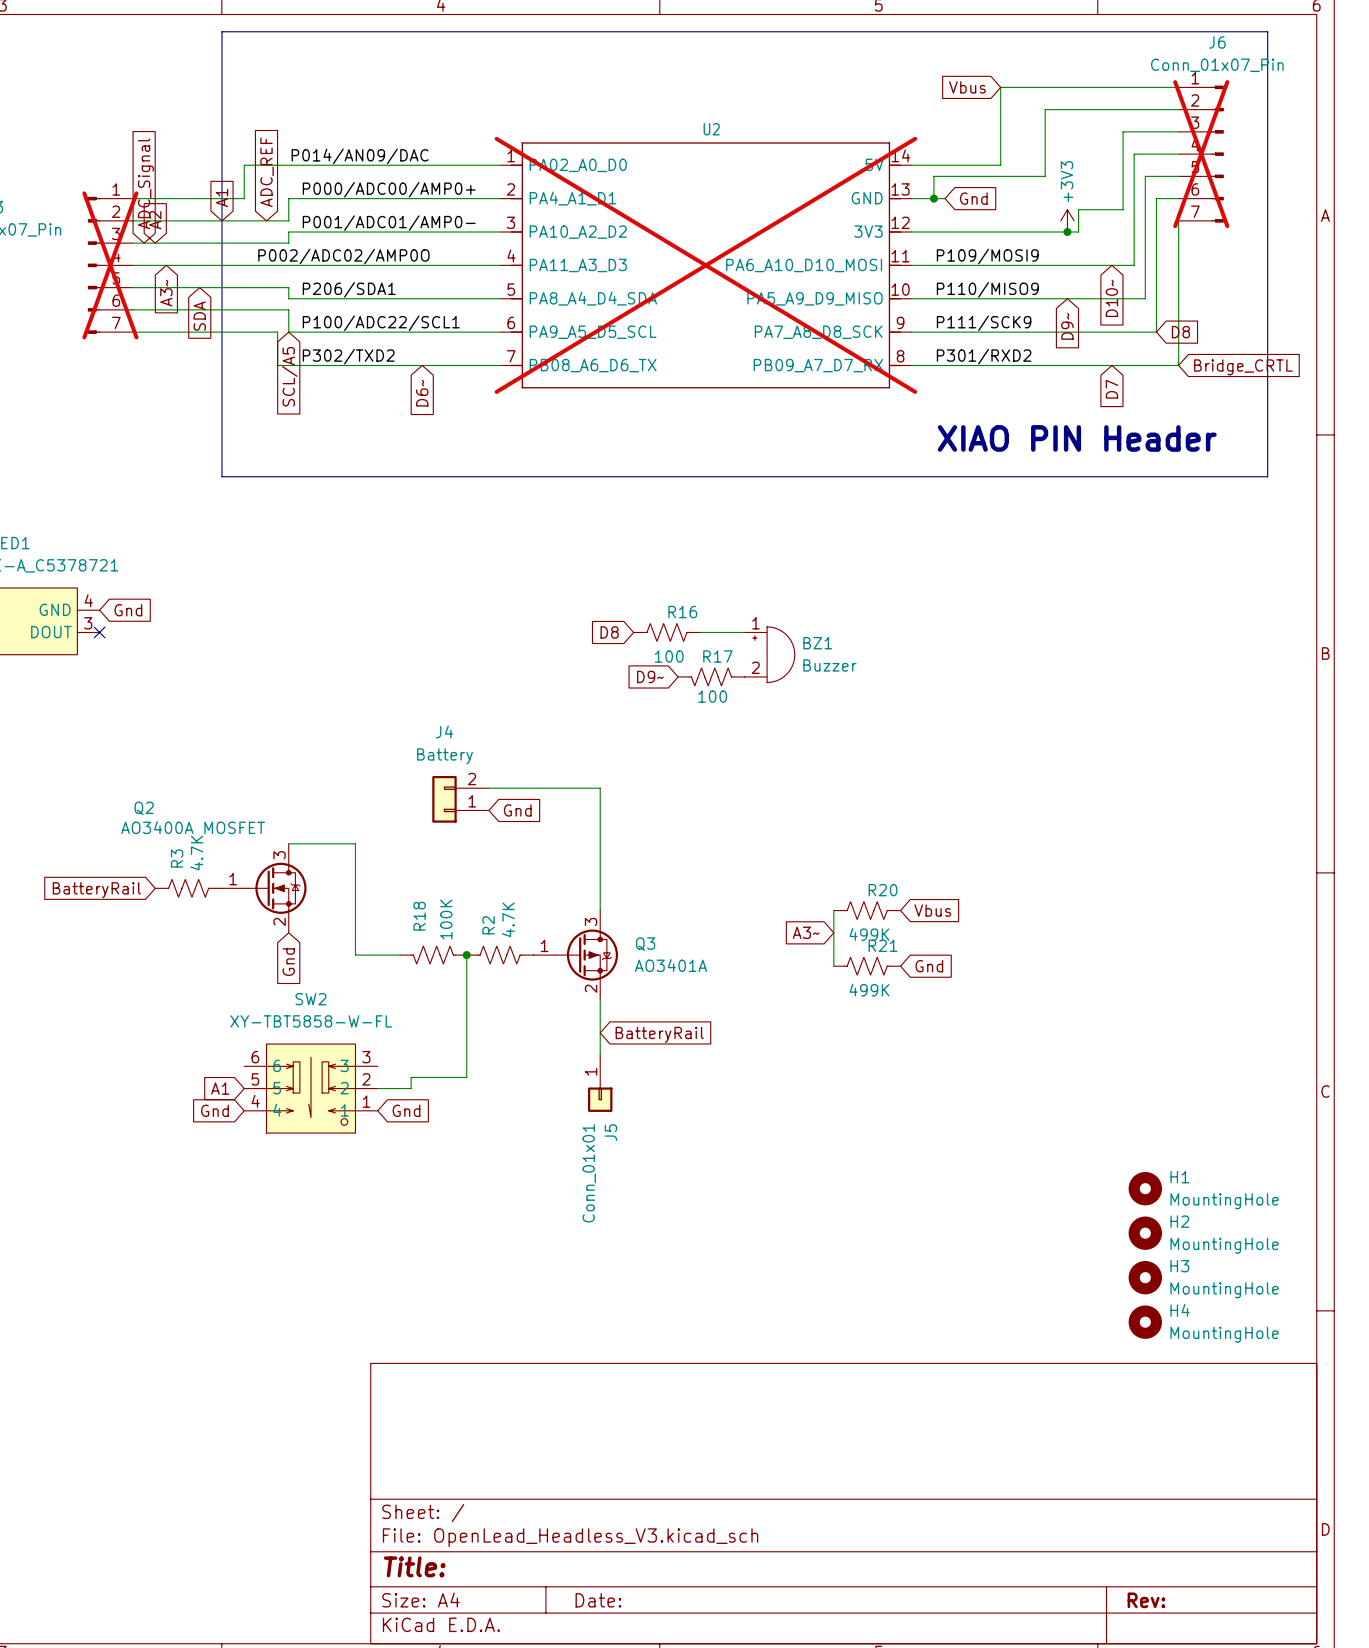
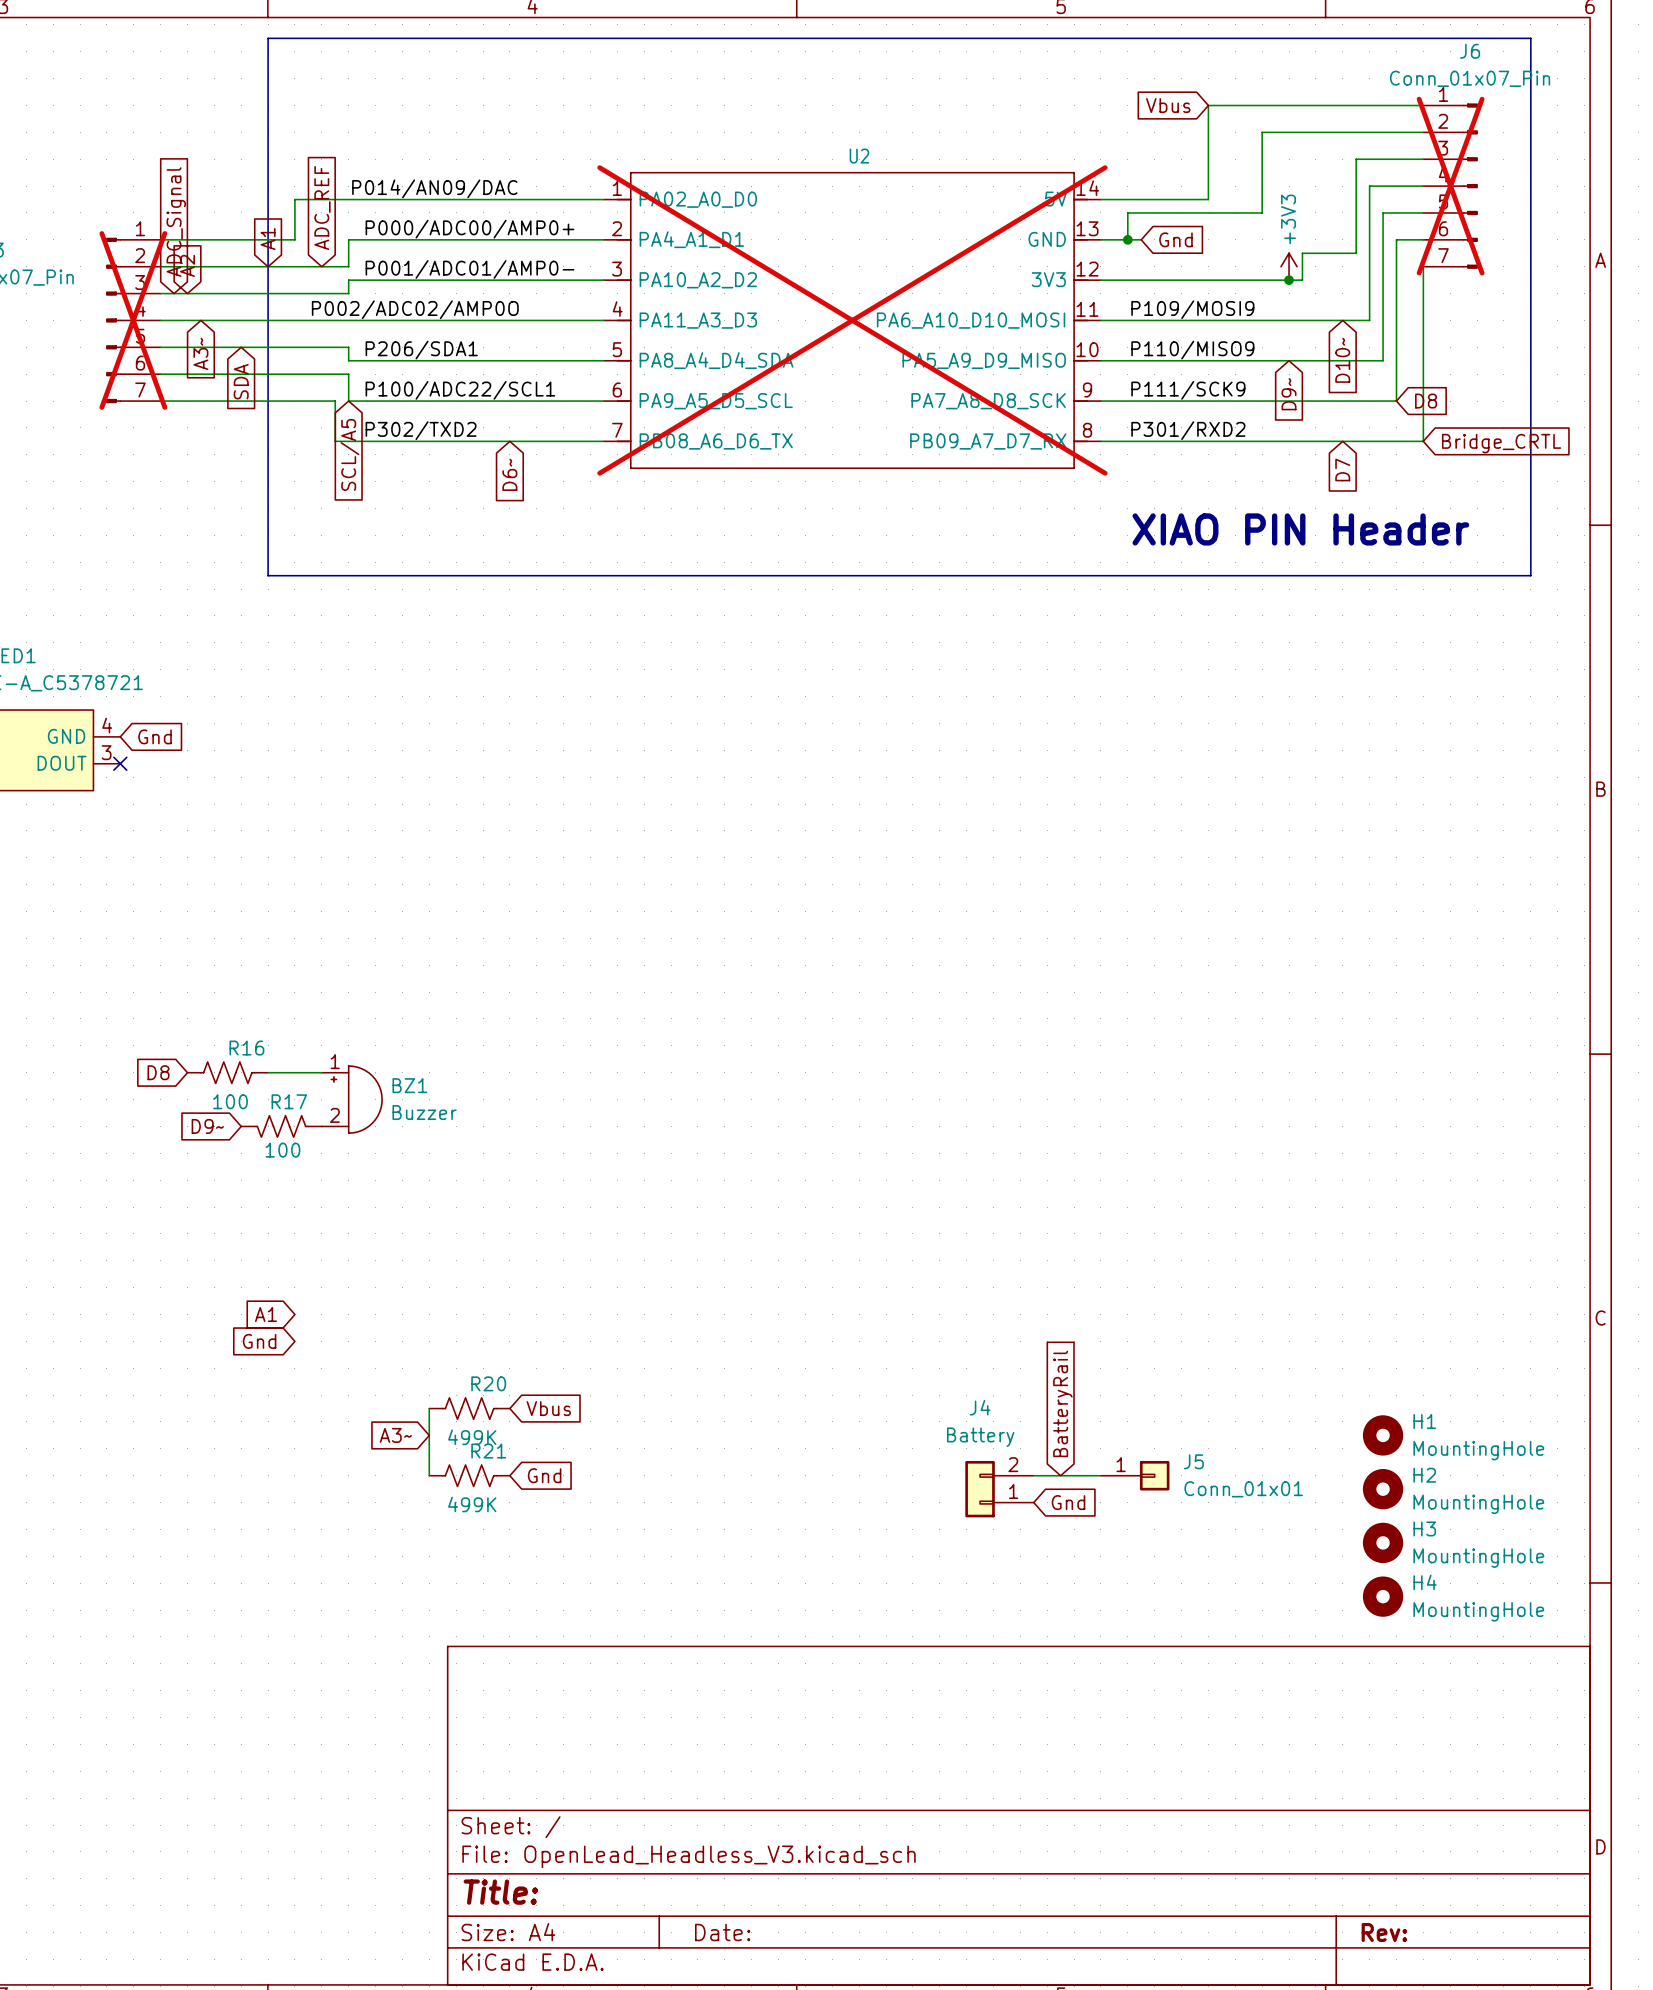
global label: D8 (609, 632) -> none
R16: 100 (666, 632) -> none
wire: (700, 632) (744, 632) -> none
BZ1 position: (769, 654) -> (351, 1099)
global label: D9~ (650, 676) -> none
R17 position: (711, 676) -> (281, 1126)
wire: (488, 788) (600, 788) (600, 910) -> none
J4 position: (460, 799) -> (999, 1489)
global label: Gnd (517, 810) -> none
wire: (288, 843) (355, 843) (355, 955) (399, 955) -> none
R3 value: 4.7K (196, 853) -> 100 (230, 1101)
R3 name: R3 (177, 858) -> R16 (246, 1048)
Q2: AO3400A MOSFET (264, 888) -> none
global label: BatteryRail (96, 890) -> D8 (158, 1072)
wire: (833, 910) (833, 966) -> none
R20 position: (867, 910) -> (469, 1408)
global label: Vbus (932, 910) -> none
global label: none -> D9~ (207, 1126)
global label: A3~ (806, 932) -> none
R18: 100K (433, 955) -> none
wire: (466, 955) (466, 1077) (411, 1077) (411, 1088) (377, 1088) -> none
junction: (466, 955) -> none
R2: 4.7K (500, 955) -> none
Q3: AO3401A (575, 955) -> none
global label: Gnd (288, 962) -> none
R21 position: (867, 966) -> (469, 1475)
global label: Gnd (929, 966) -> none
wire: (600, 999) (600, 1055) -> none
global label: BatteryRail (659, 1034) -> none
J5 position: (600, 1083) -> (1135, 1475)
SW2: XY-TBT5858-W-FL (310, 1088) -> none
J5 rotation: 0° (600, 1099) -> 90° counterclockwise (1154, 1475)
global label position: Gnd (406, 1110) -> Gnd (544, 1475)
global label: none -> BatteryRail (1062, 1403)
wire: none -> (429, 1408) (429, 1475)
global label: none -> Vbus (548, 1408)
global label: none -> A3~ (395, 1435)
wire: none -> (1033, 1475) (1100, 1475)
global label: none -> Gnd (1068, 1502)

